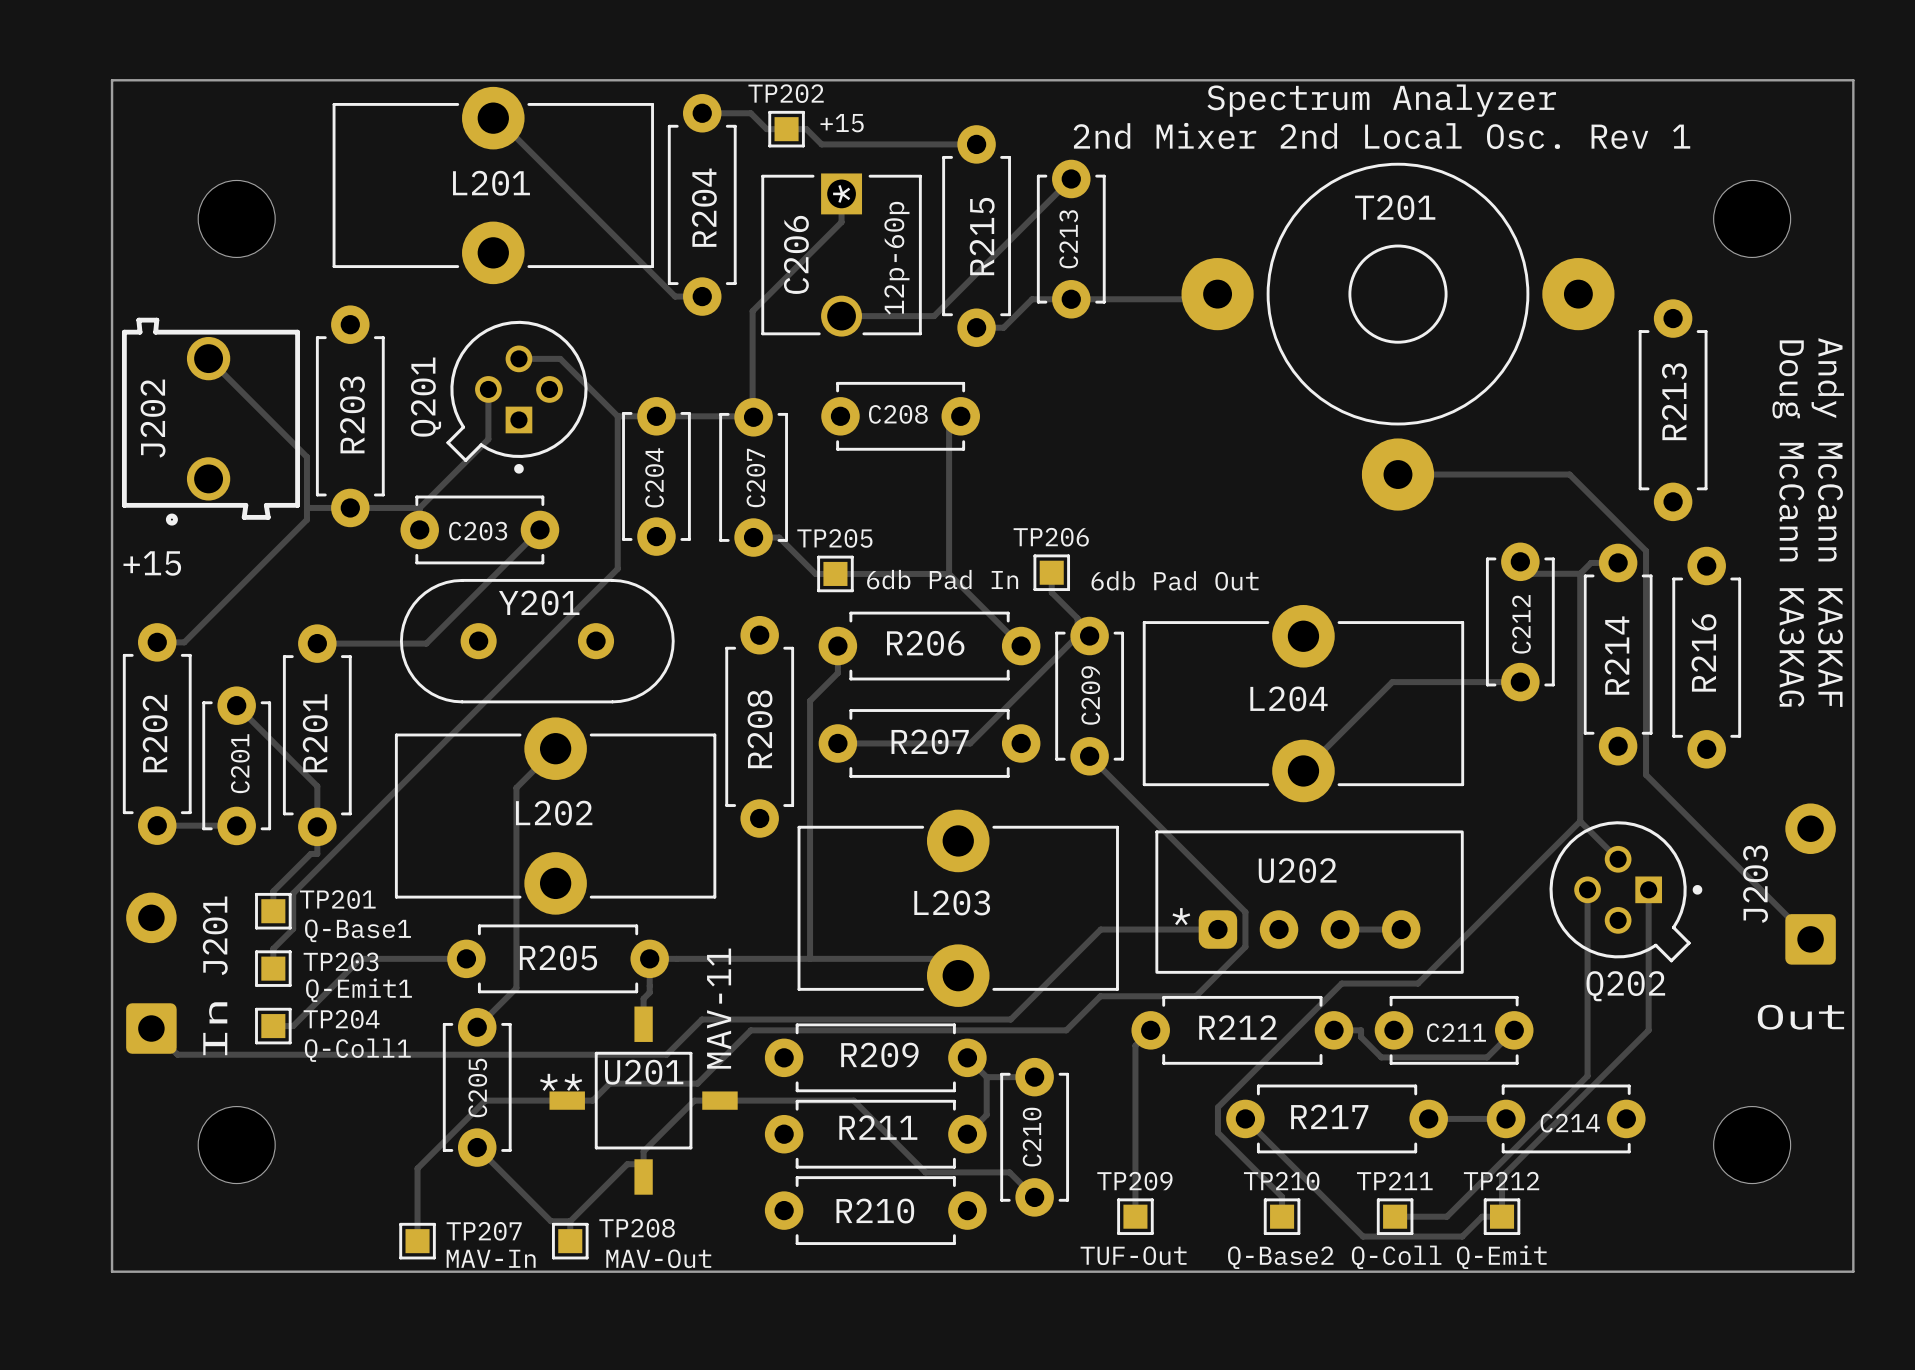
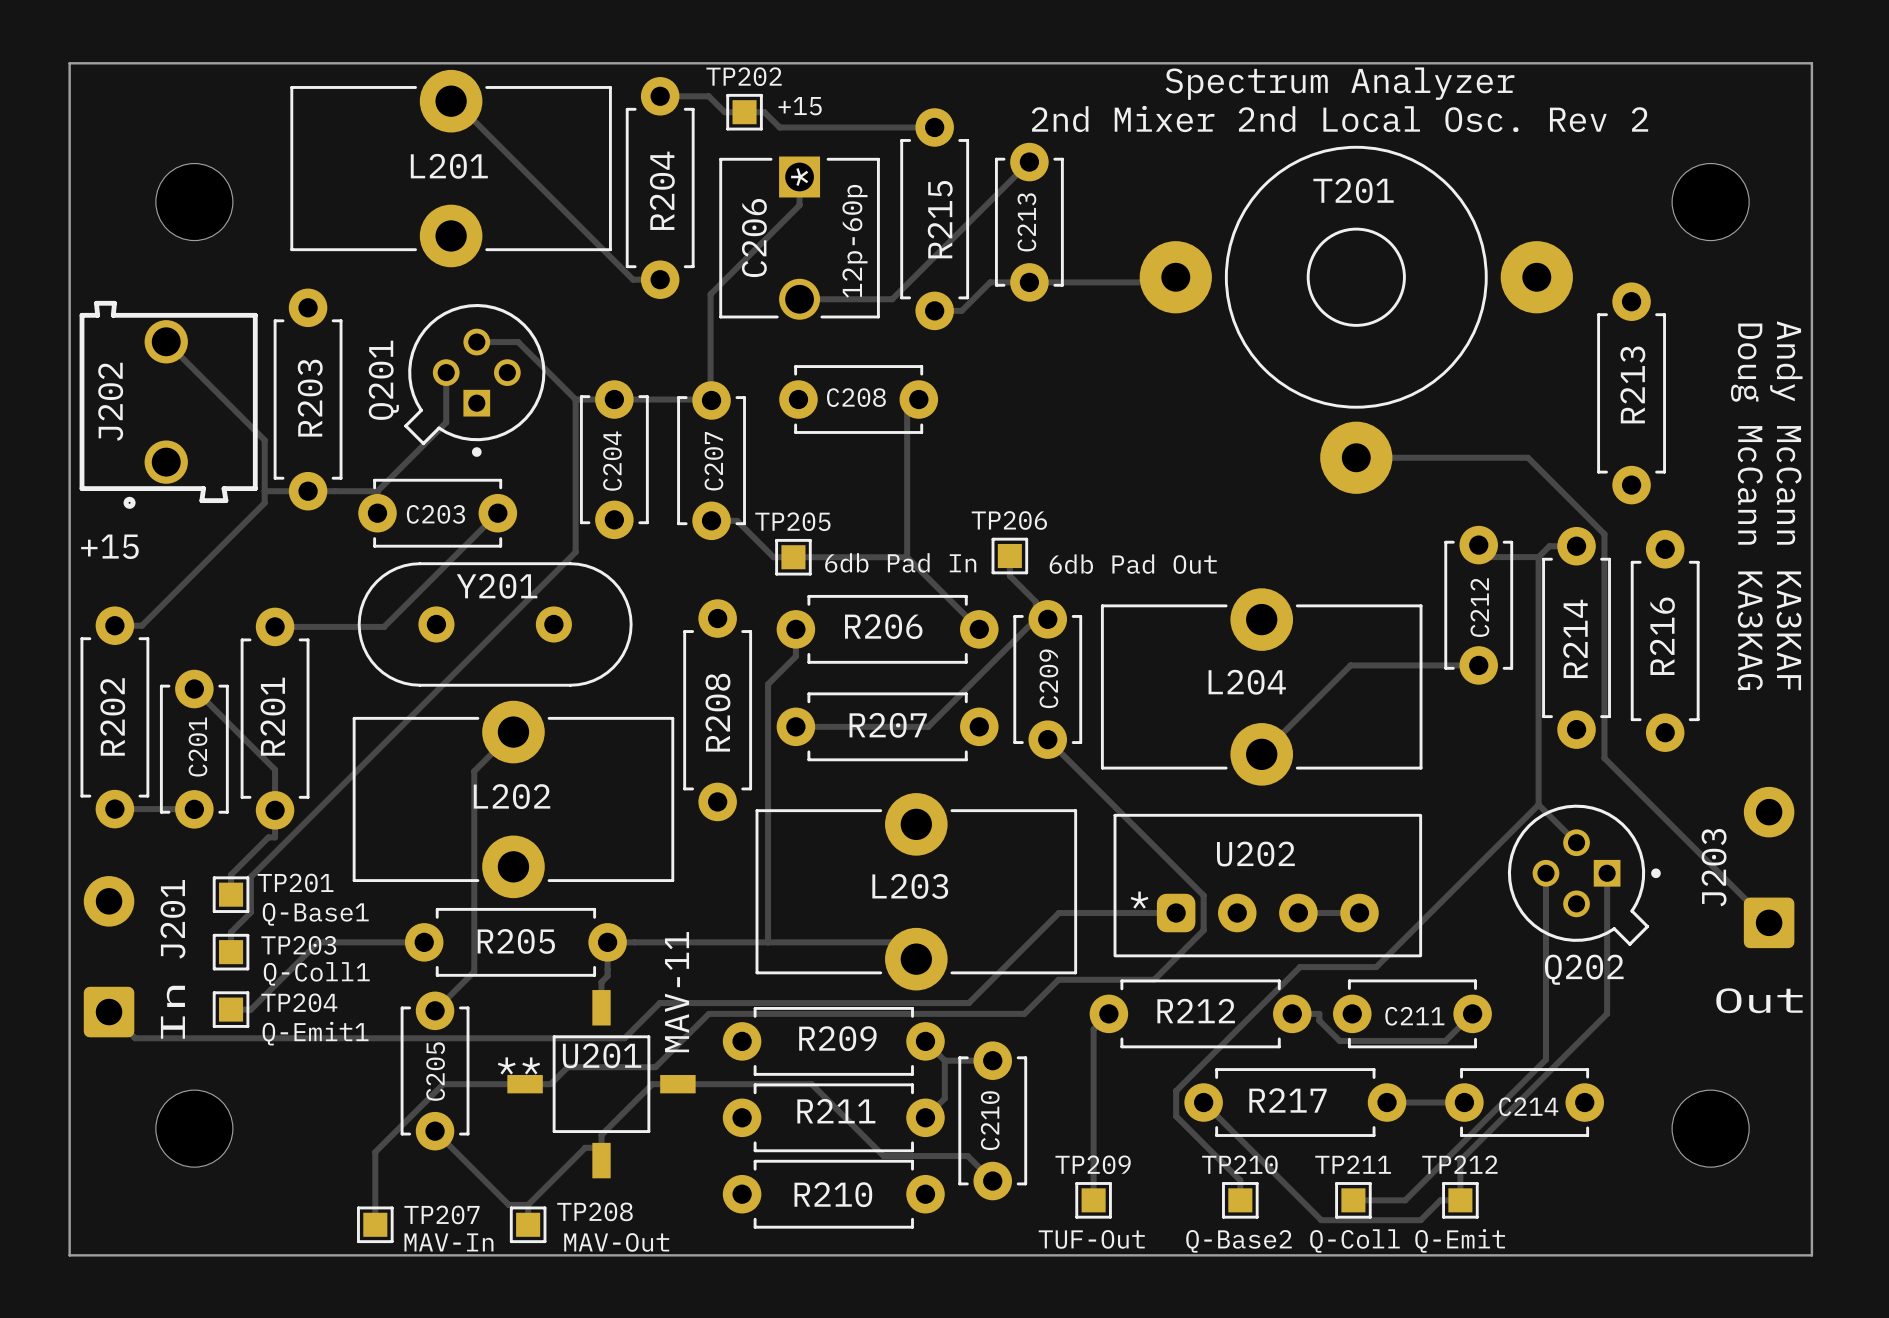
text: 2nd Mixer 2nd Local Osc. Rev 1 (1381, 135) -> 2nd Mixer 2nd Local Osc. Rev 2 (1340, 119)
TP203 text: Q-Emit1 (358, 990) -> Q-Coll1 (316, 973)
TP204 text: Q-Coll1 (357, 1050) -> Q-Emit1 (315, 1033)

